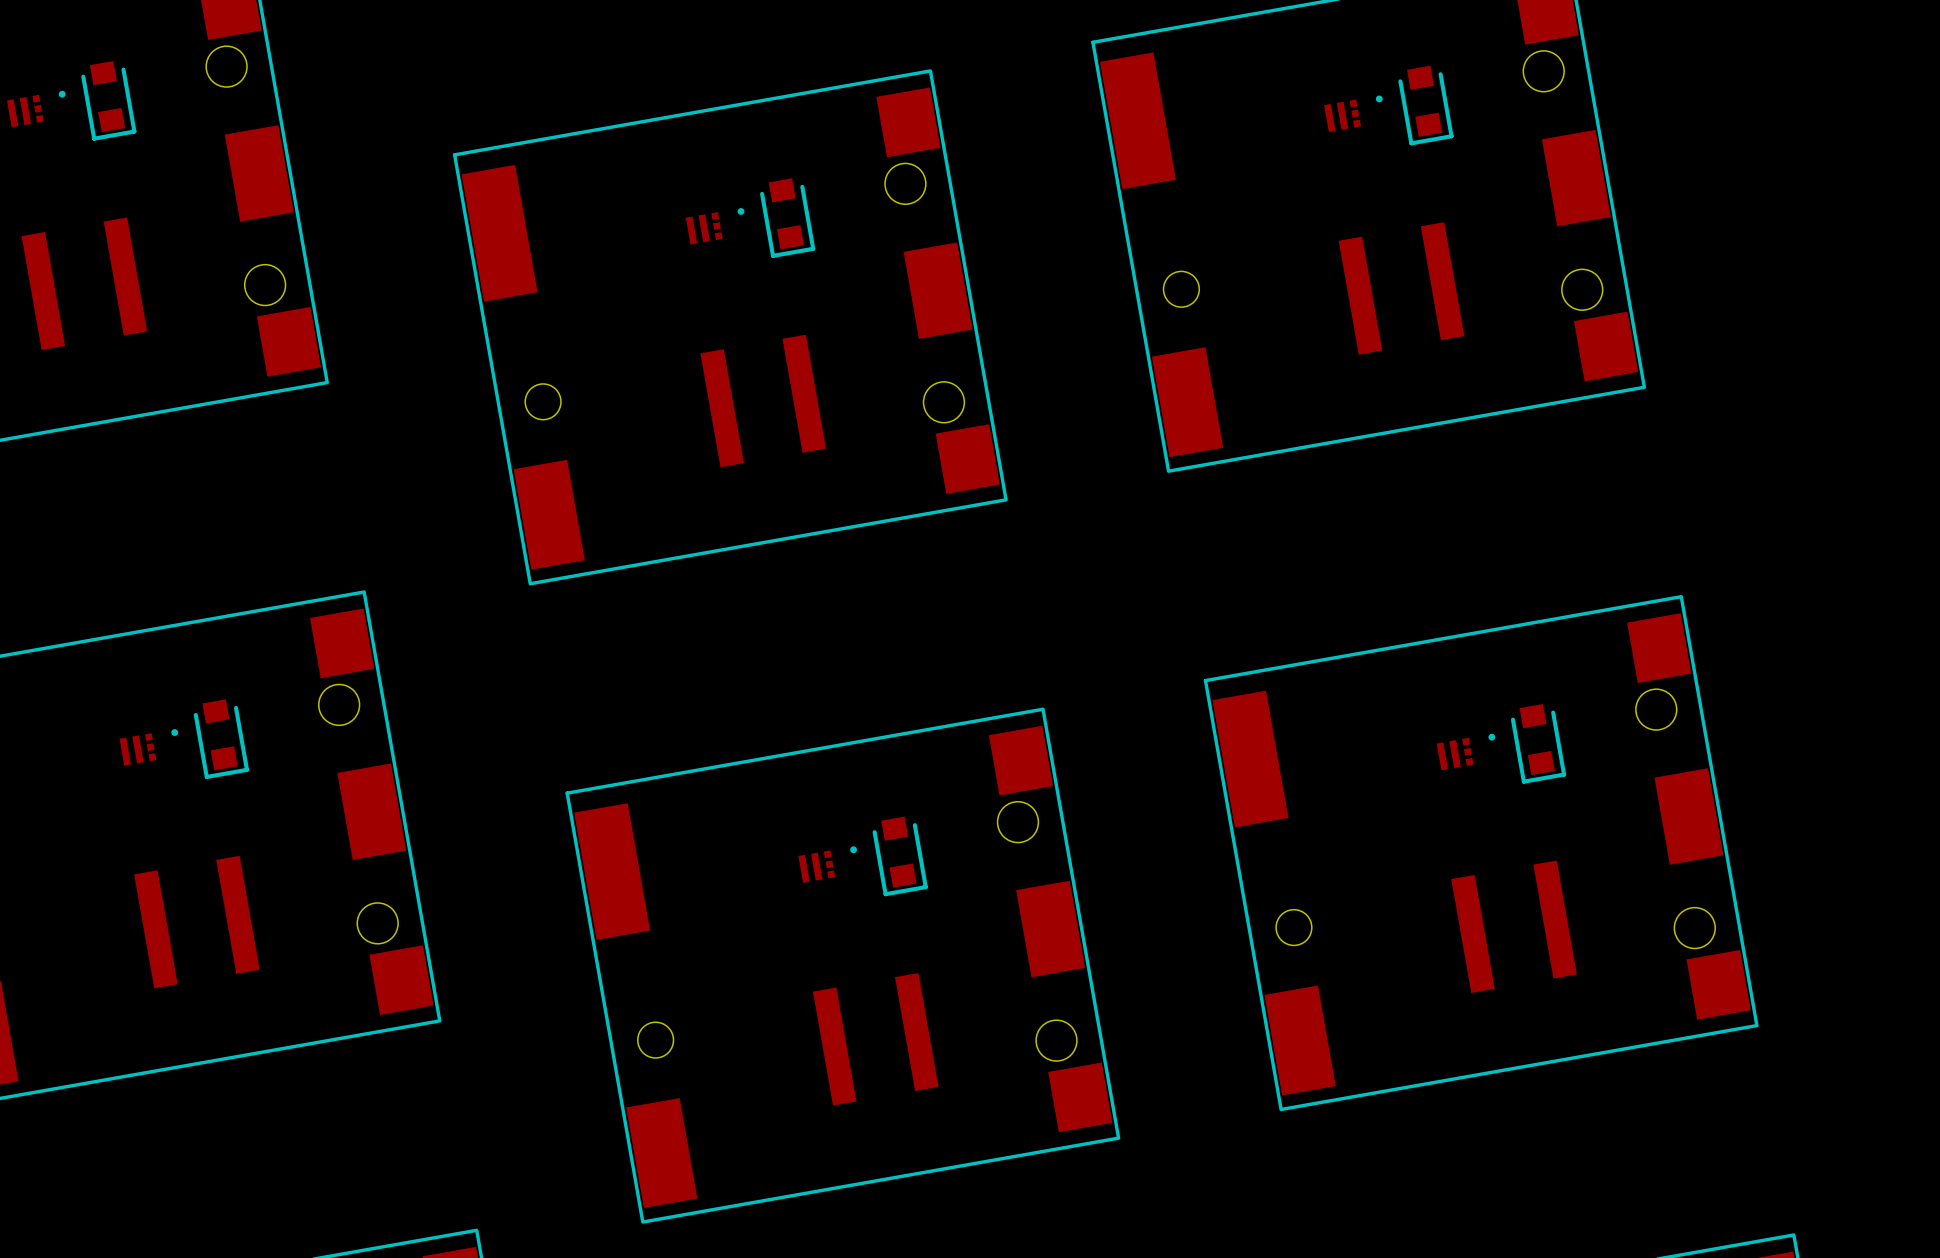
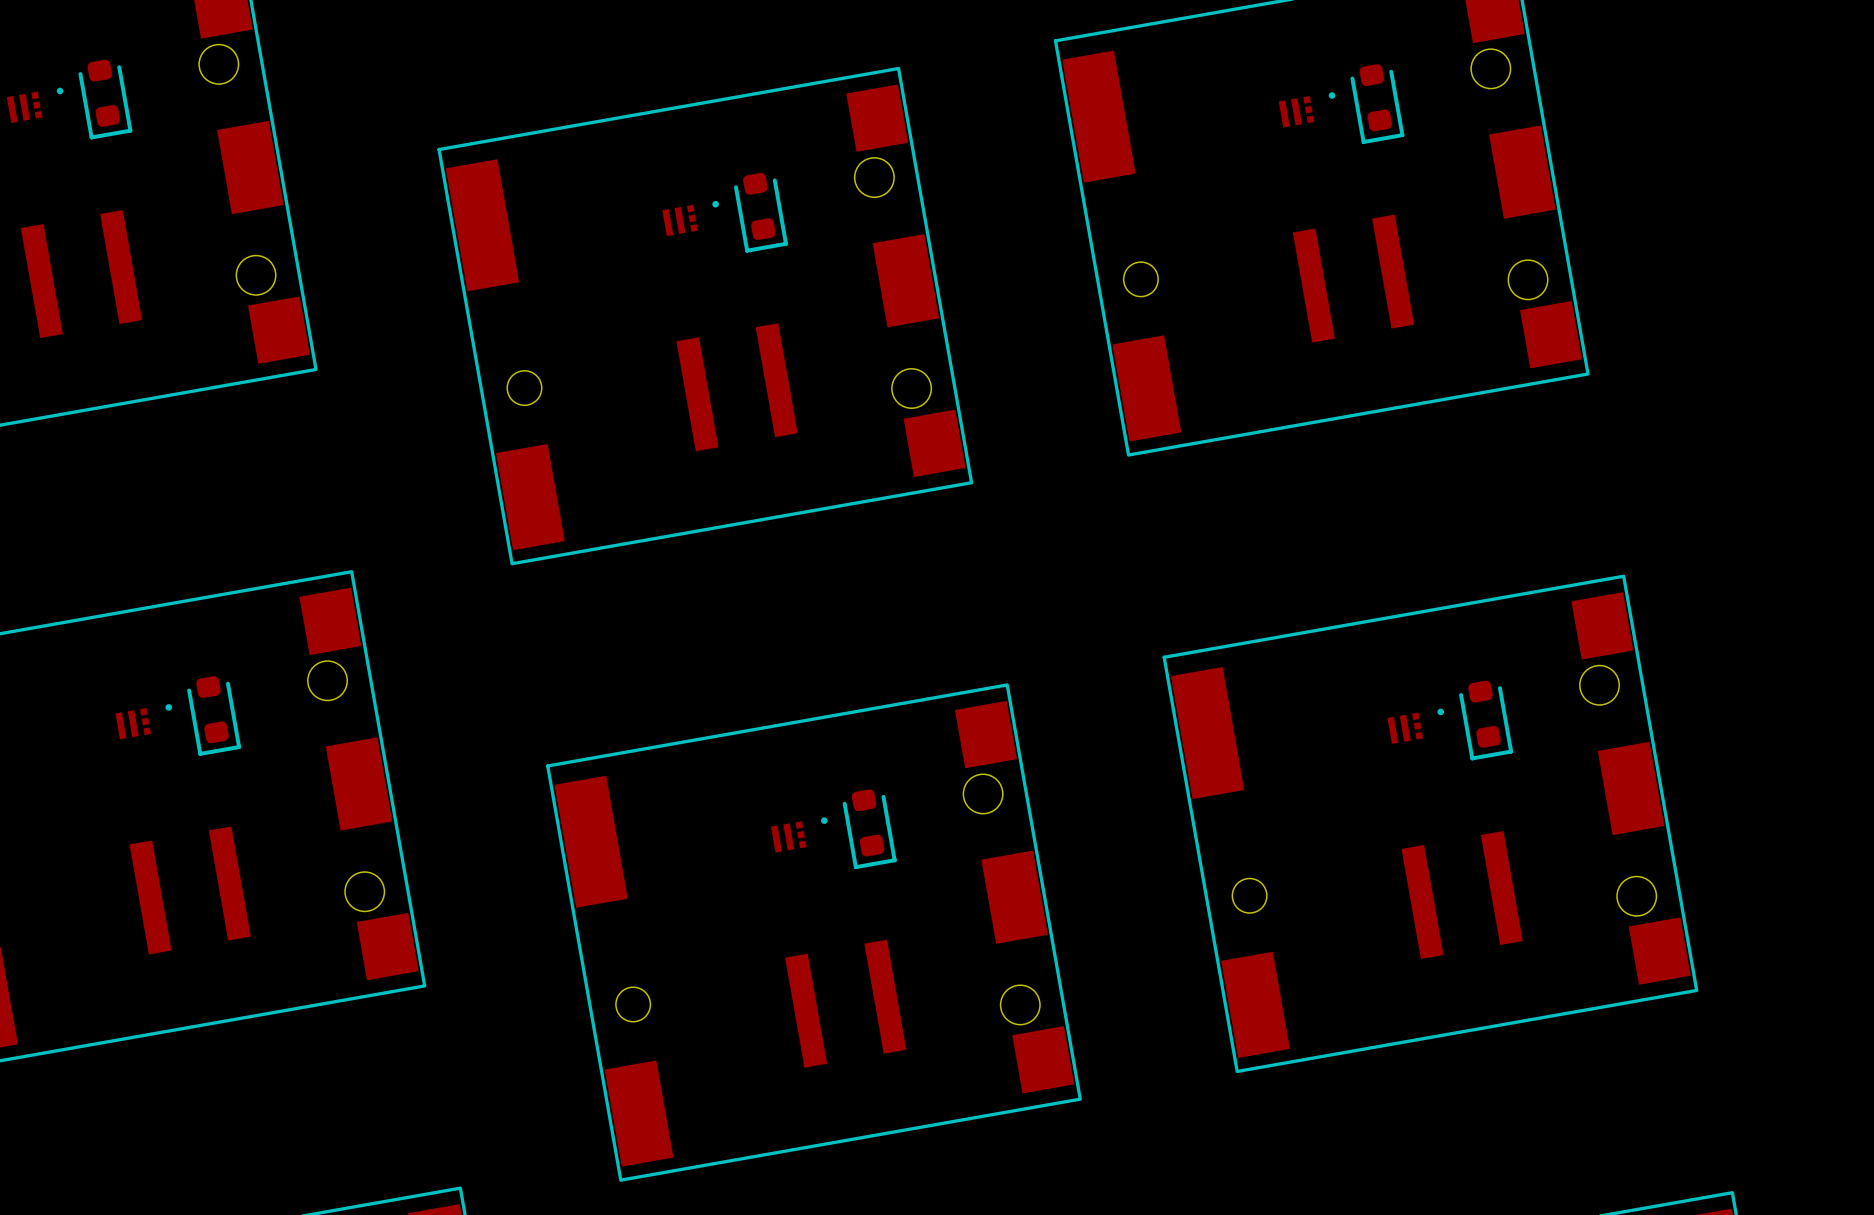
part footprint: [81, 61, 137, 141] -> [78, 59, 133, 140]
part footprint: [1398, 65, 1454, 146] -> [1350, 64, 1405, 144]
part footprint: [760, 178, 816, 258] -> [734, 172, 788, 253]
part footprint: [193, 699, 250, 780] -> [187, 676, 242, 756]
part footprint: [1510, 704, 1567, 784] -> [1459, 680, 1514, 761]
part footprint: [872, 816, 928, 897] -> [842, 789, 897, 870]

